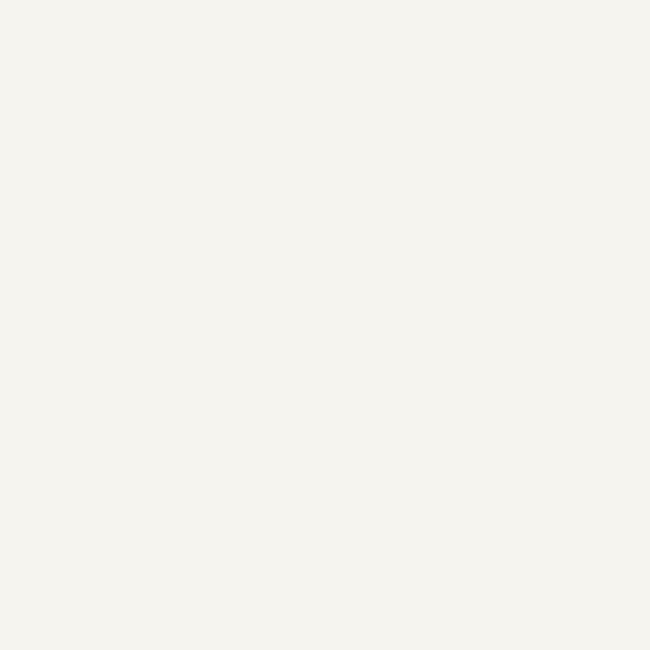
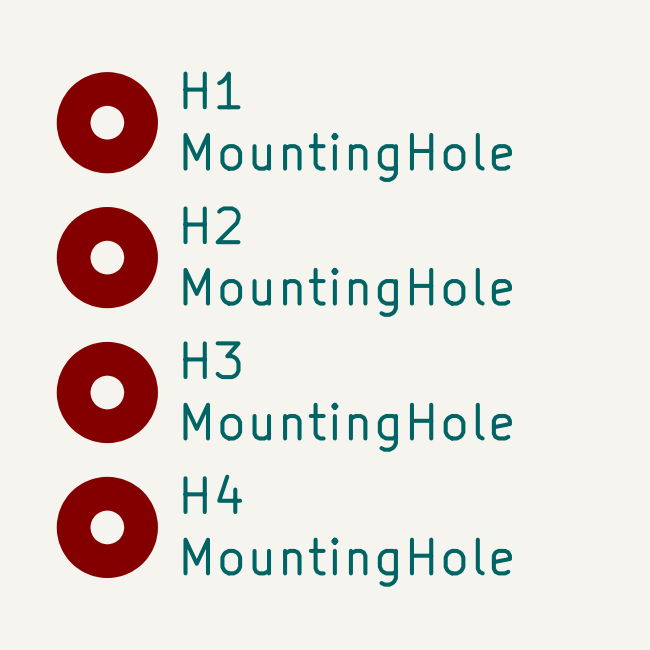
H1: none -> MountingHole (107, 122)
H2: none -> MountingHole (107, 257)
H3: none -> MountingHole (107, 392)
H4: none -> MountingHole (107, 527)

